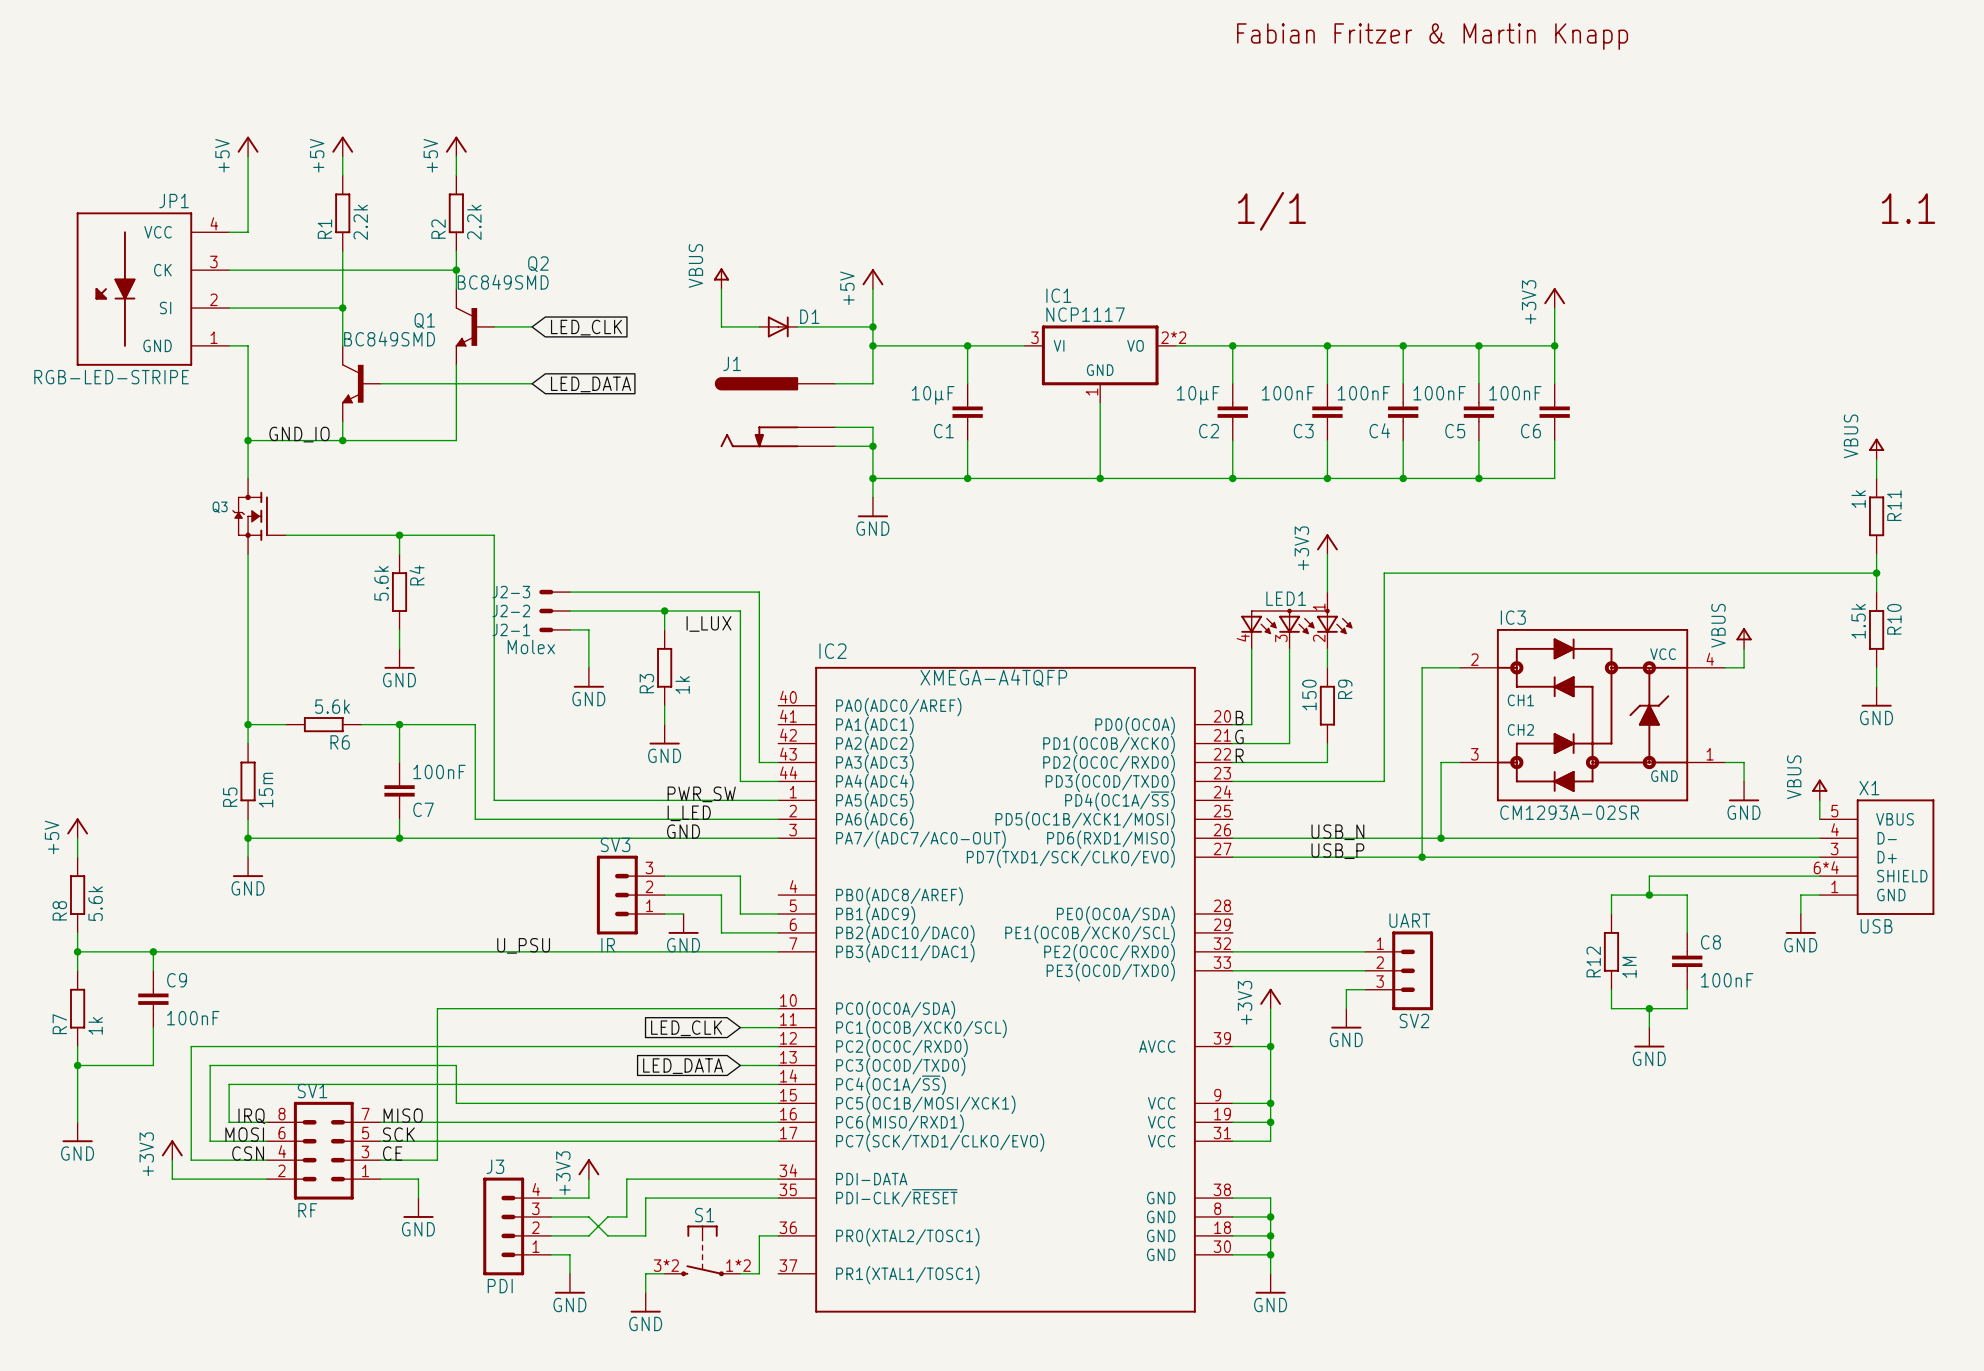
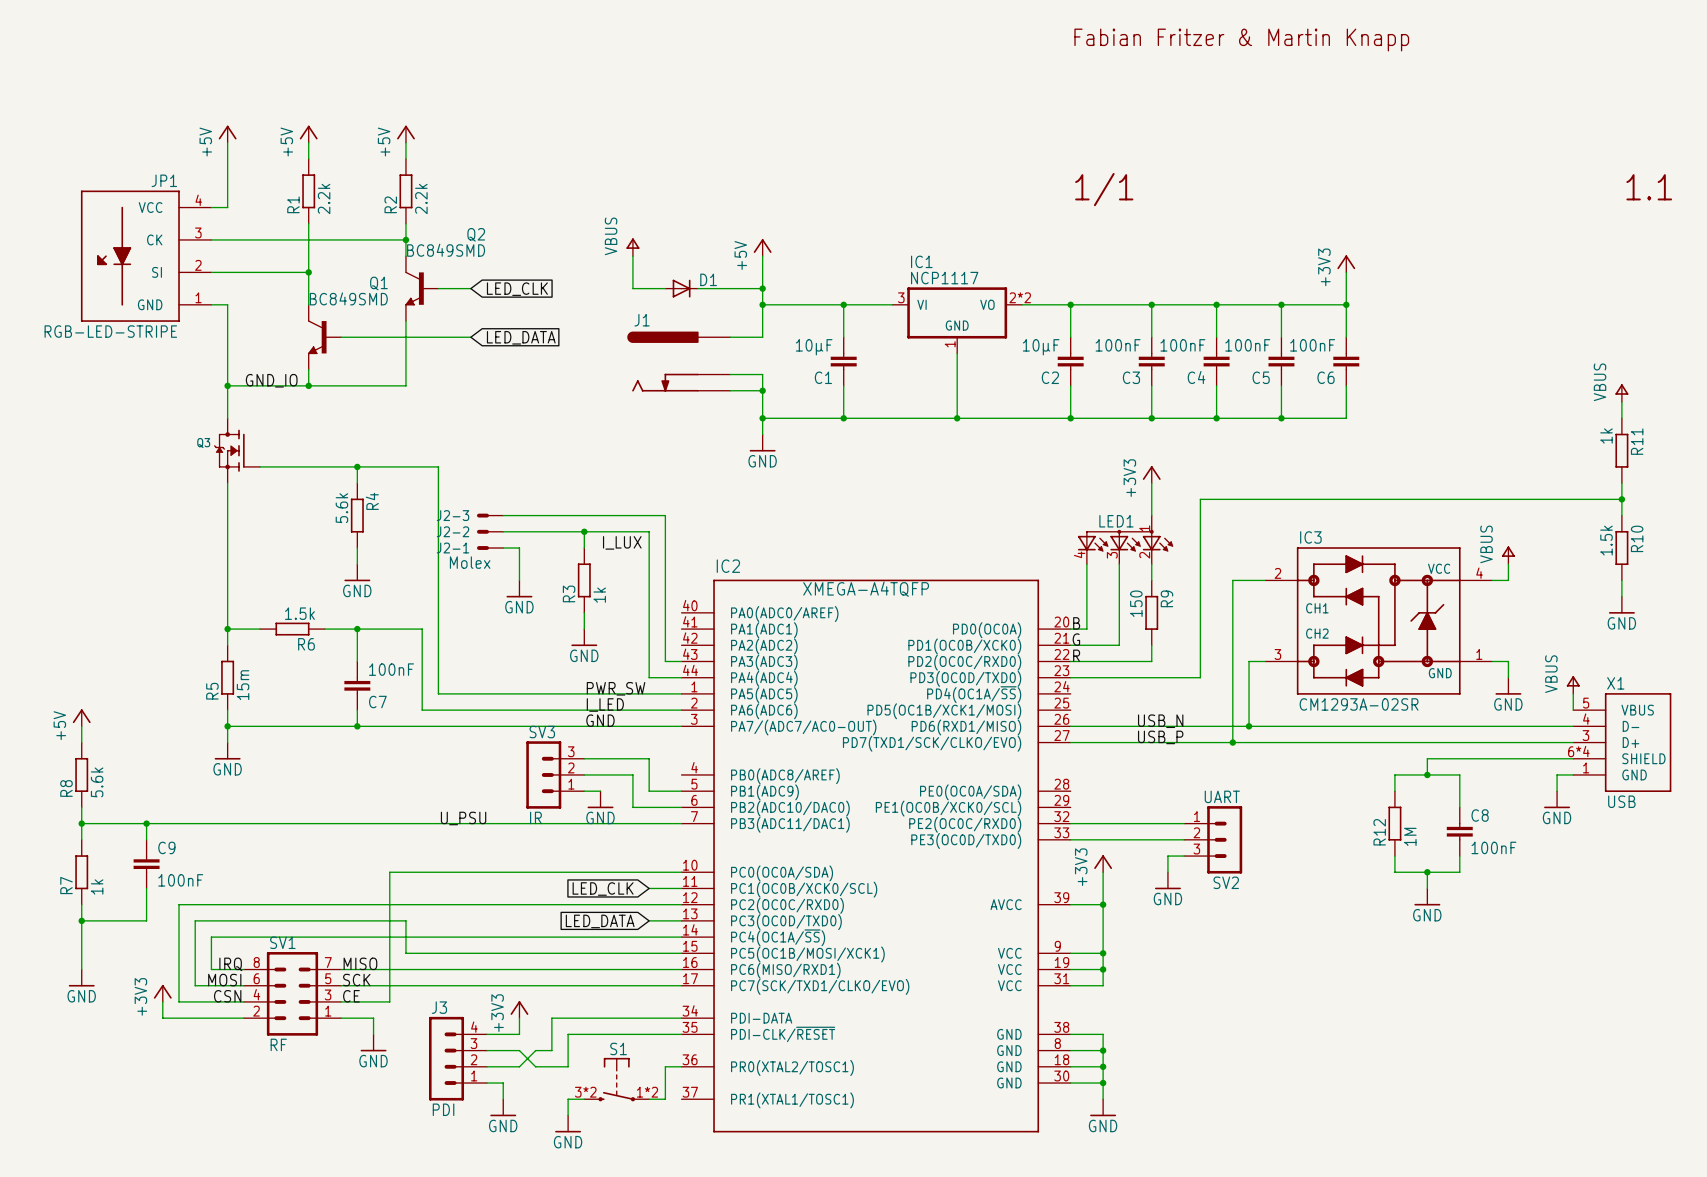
R6 value: 5.6k (332, 706) -> 1.5k (299, 613)

